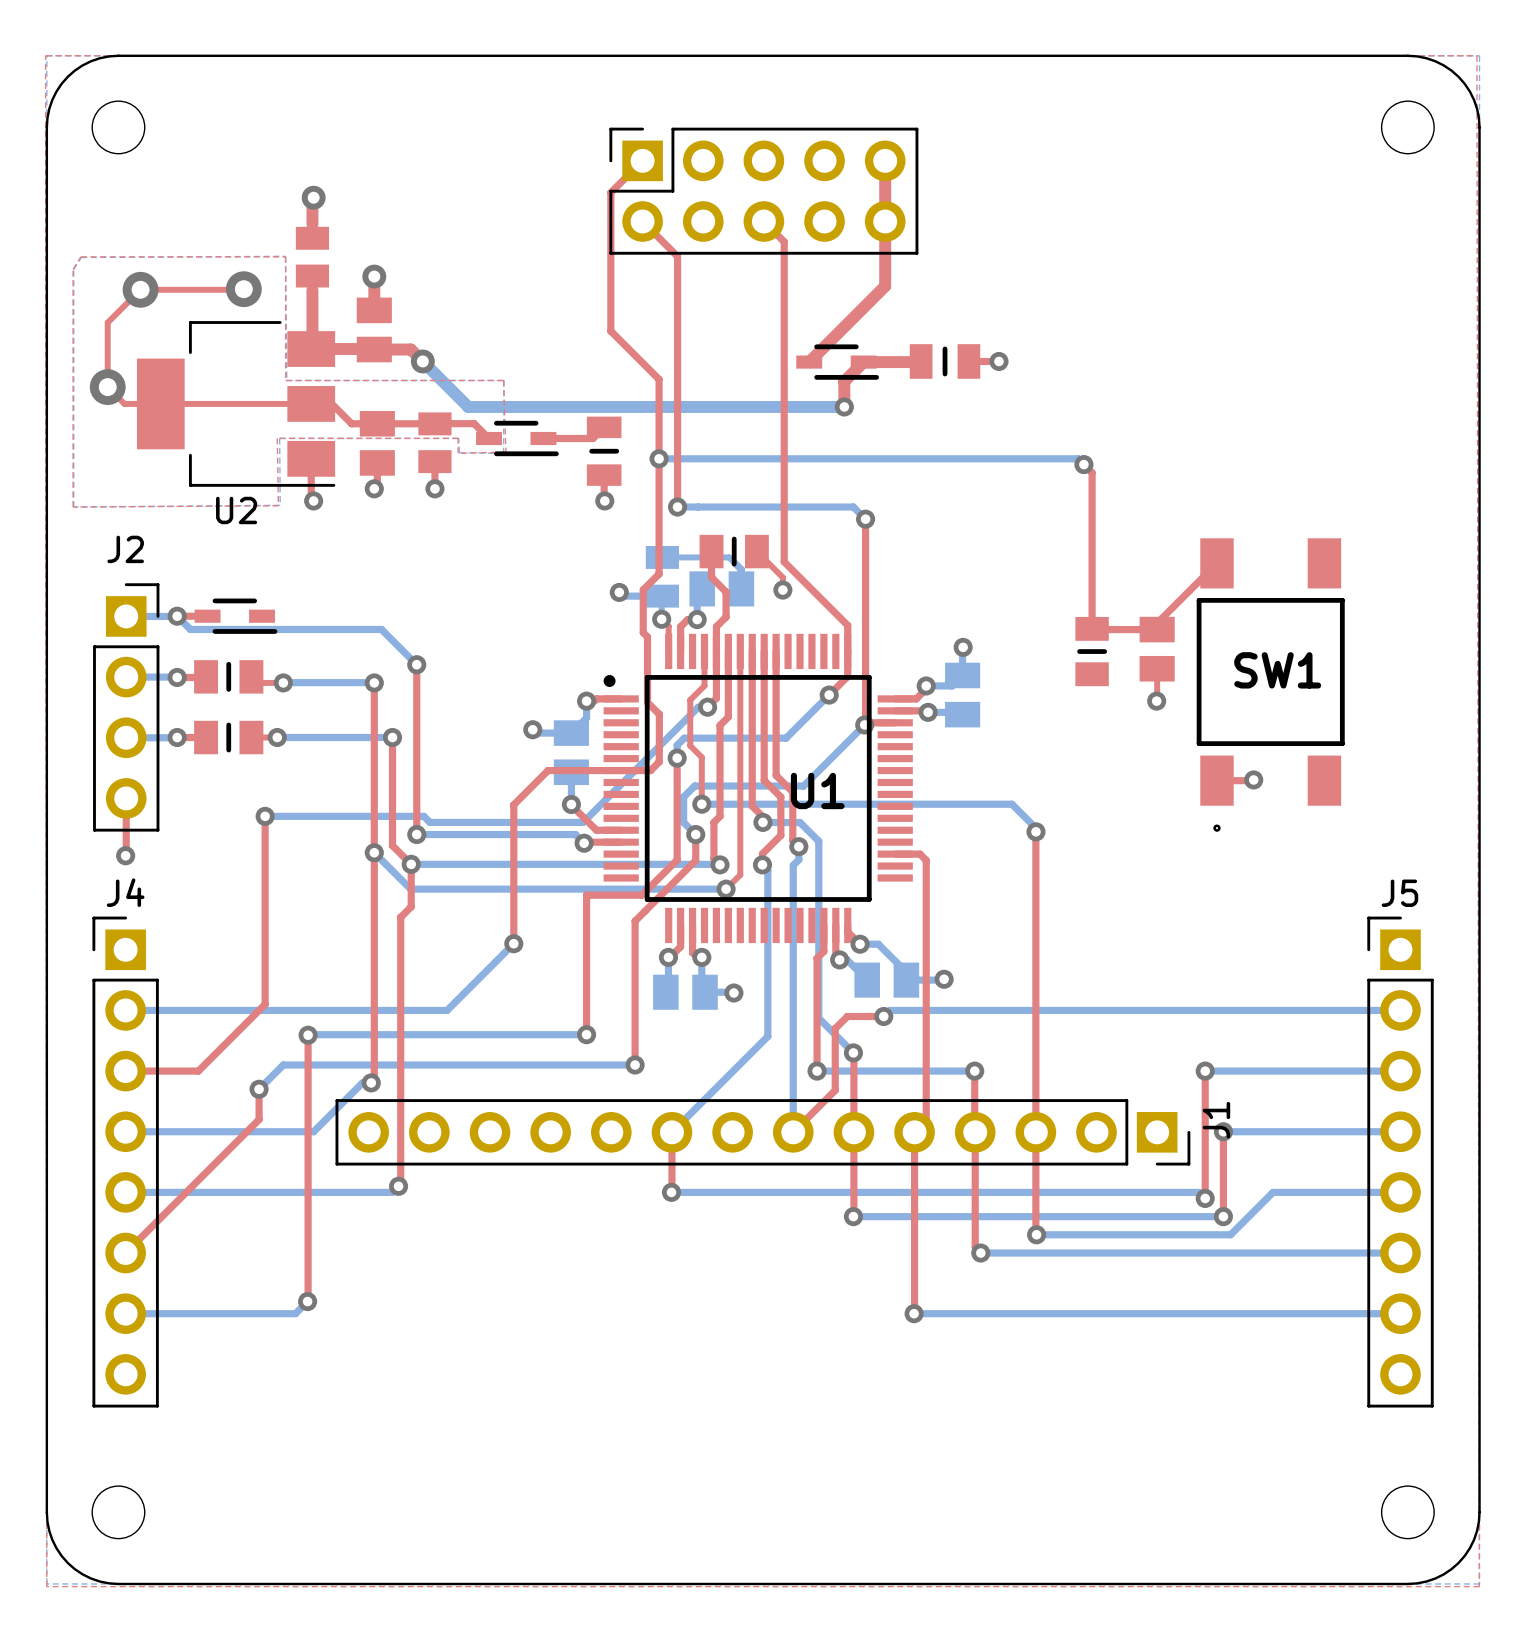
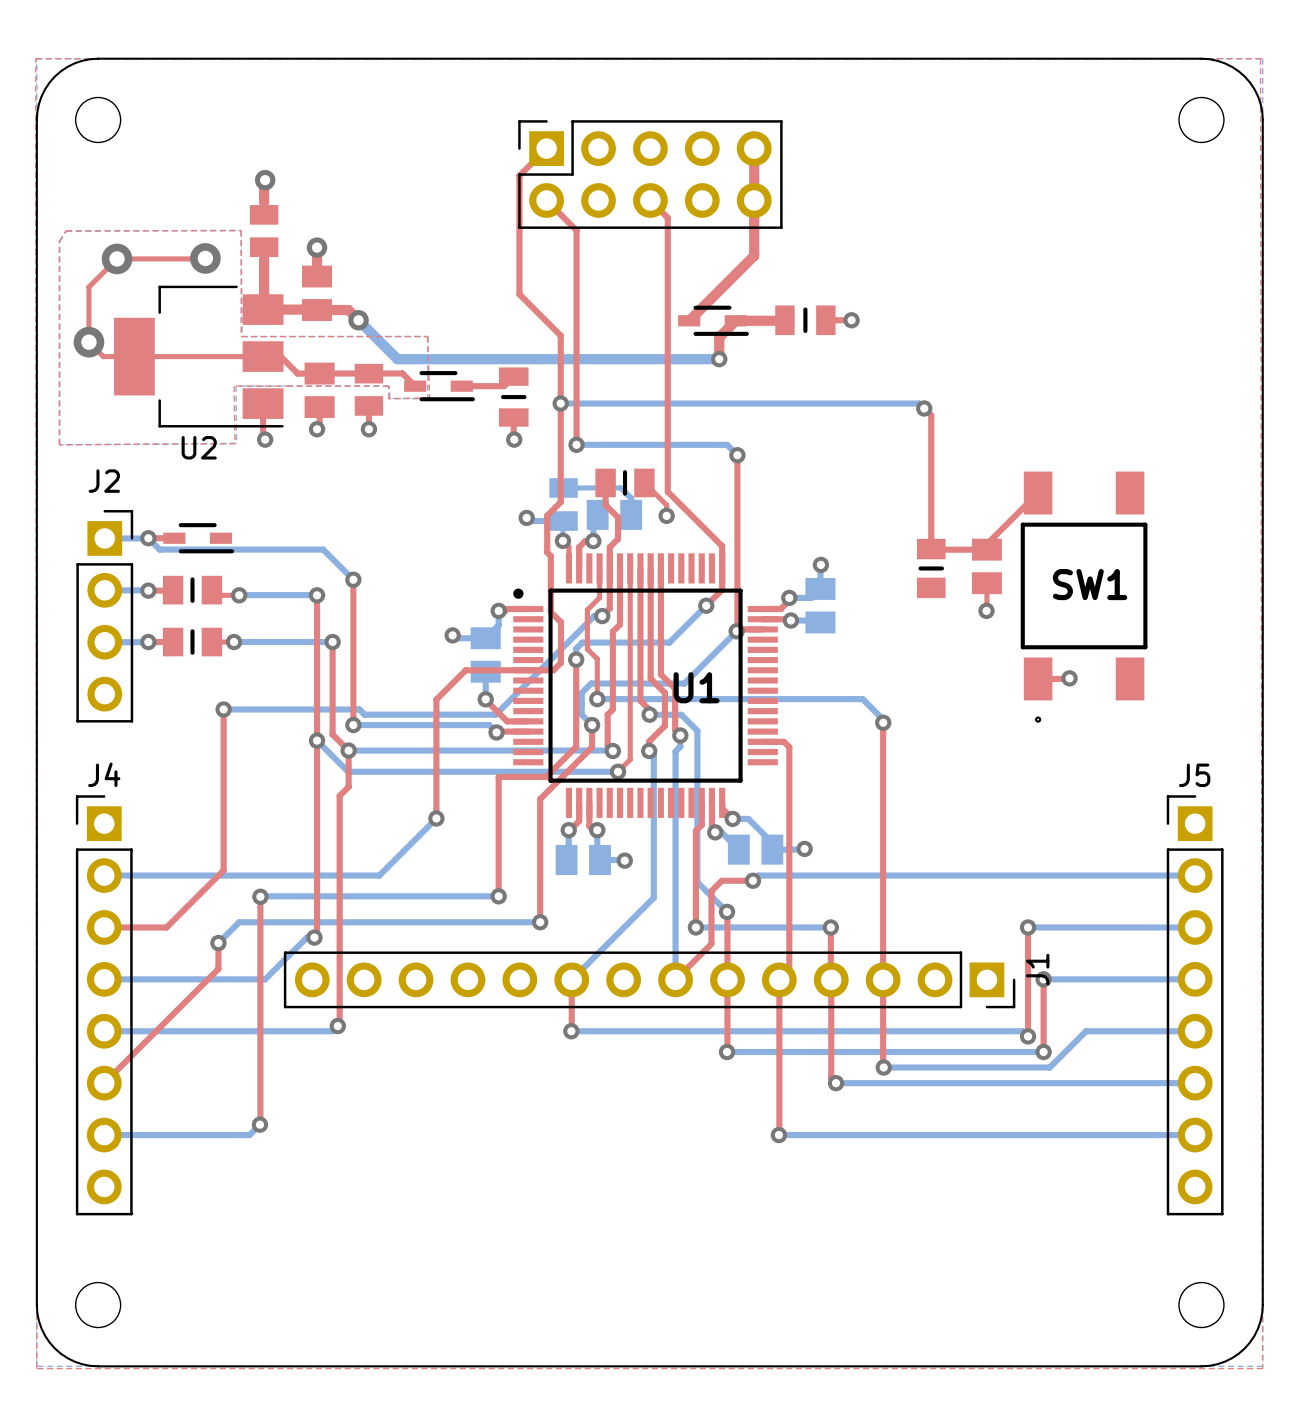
top track: (126, 798) (125, 855) -> none
via: (125, 855) -> none

